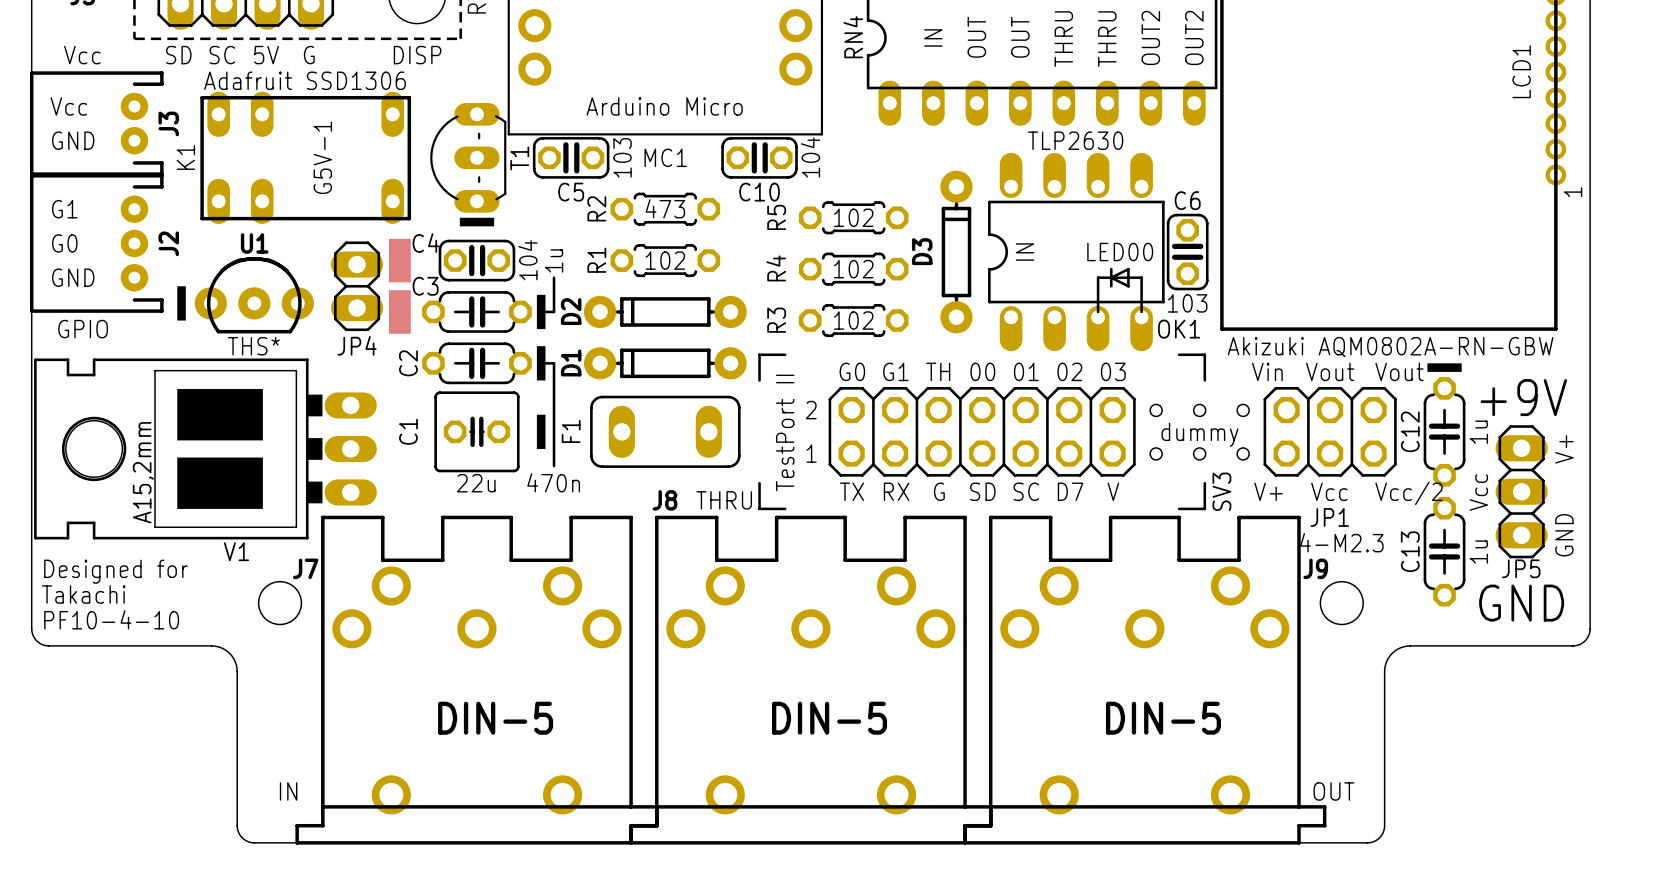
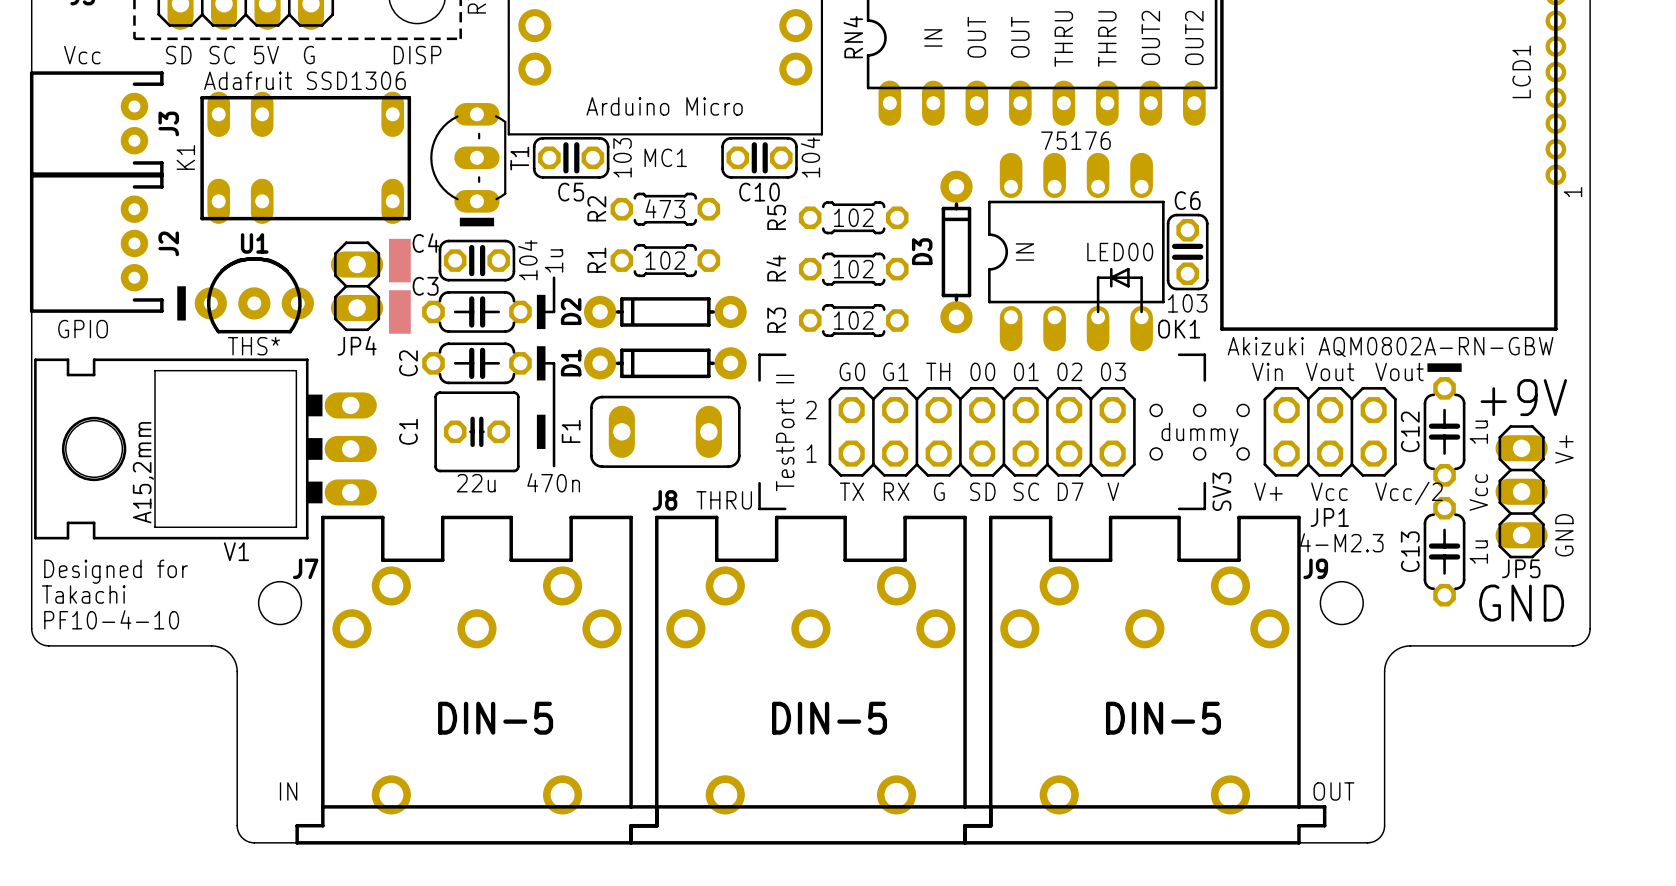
text: Vcc (68, 106) -> none
text: GND (73, 140) -> none
text: TLP2630 (1075, 140) -> 75176 (1075, 140)
text: G5V-1 (322, 157) -> none
text: G1 (64, 209) -> none
text: G0 (64, 243) -> none
text: GND (73, 277) -> none
drawing: [177, 389, 263, 509] -> none

